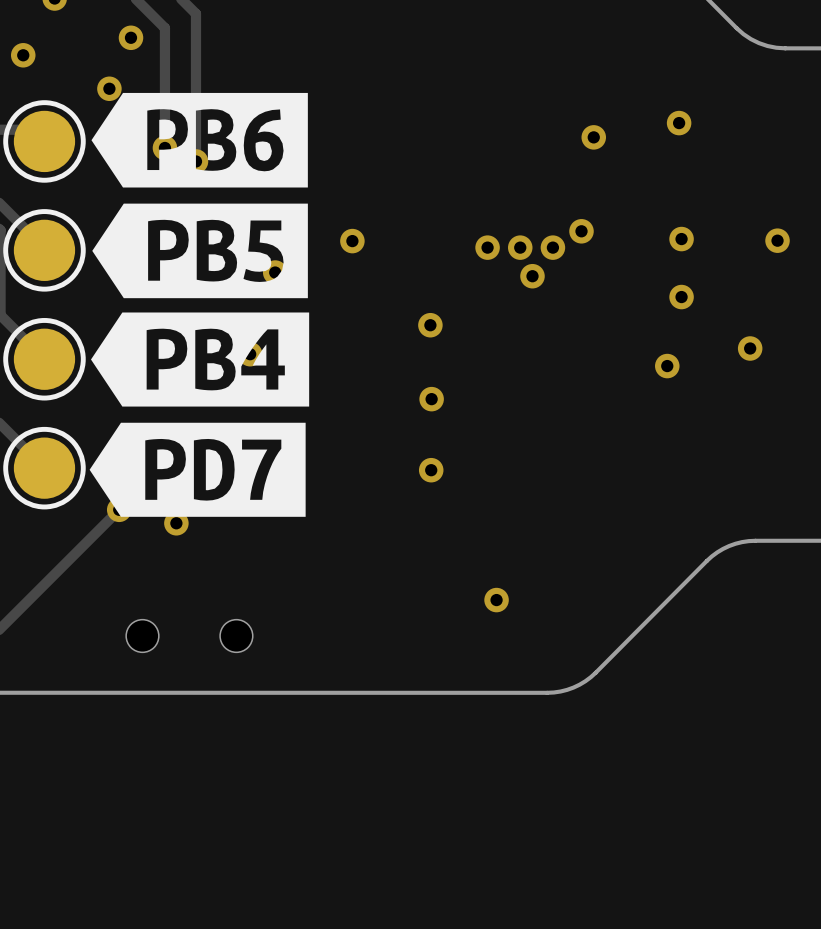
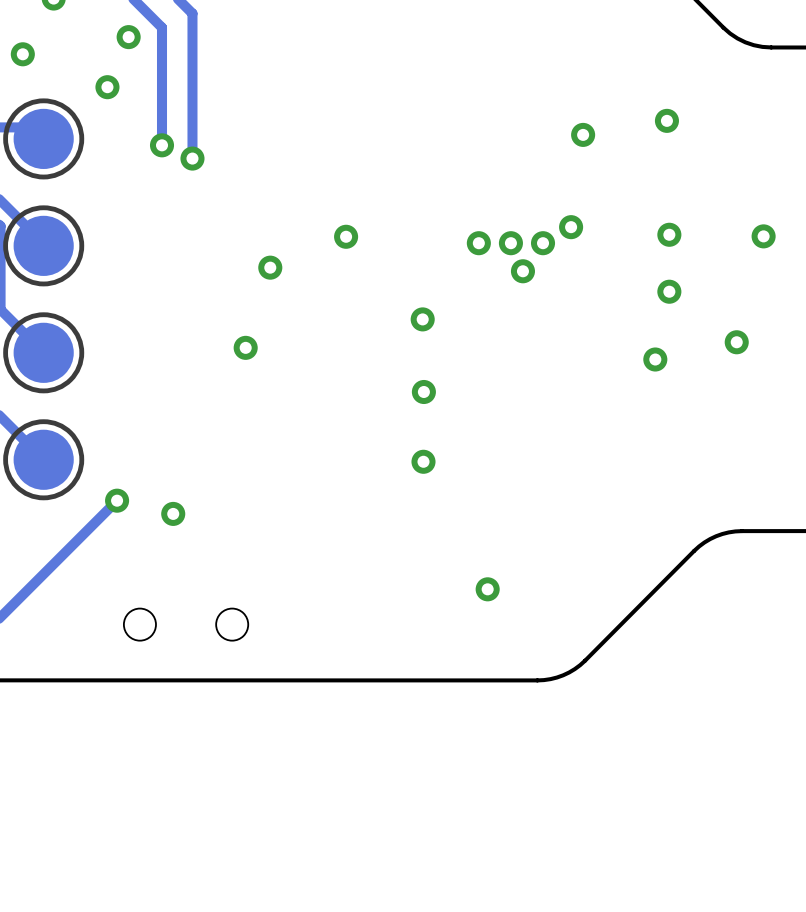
drawing: [89, 92, 310, 517] -> none

